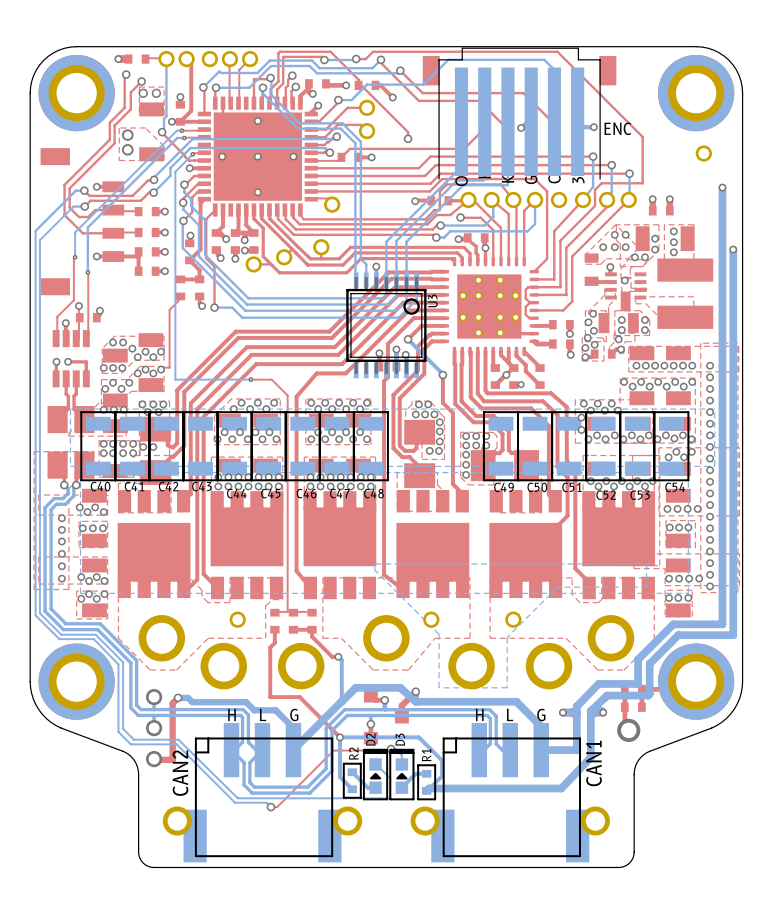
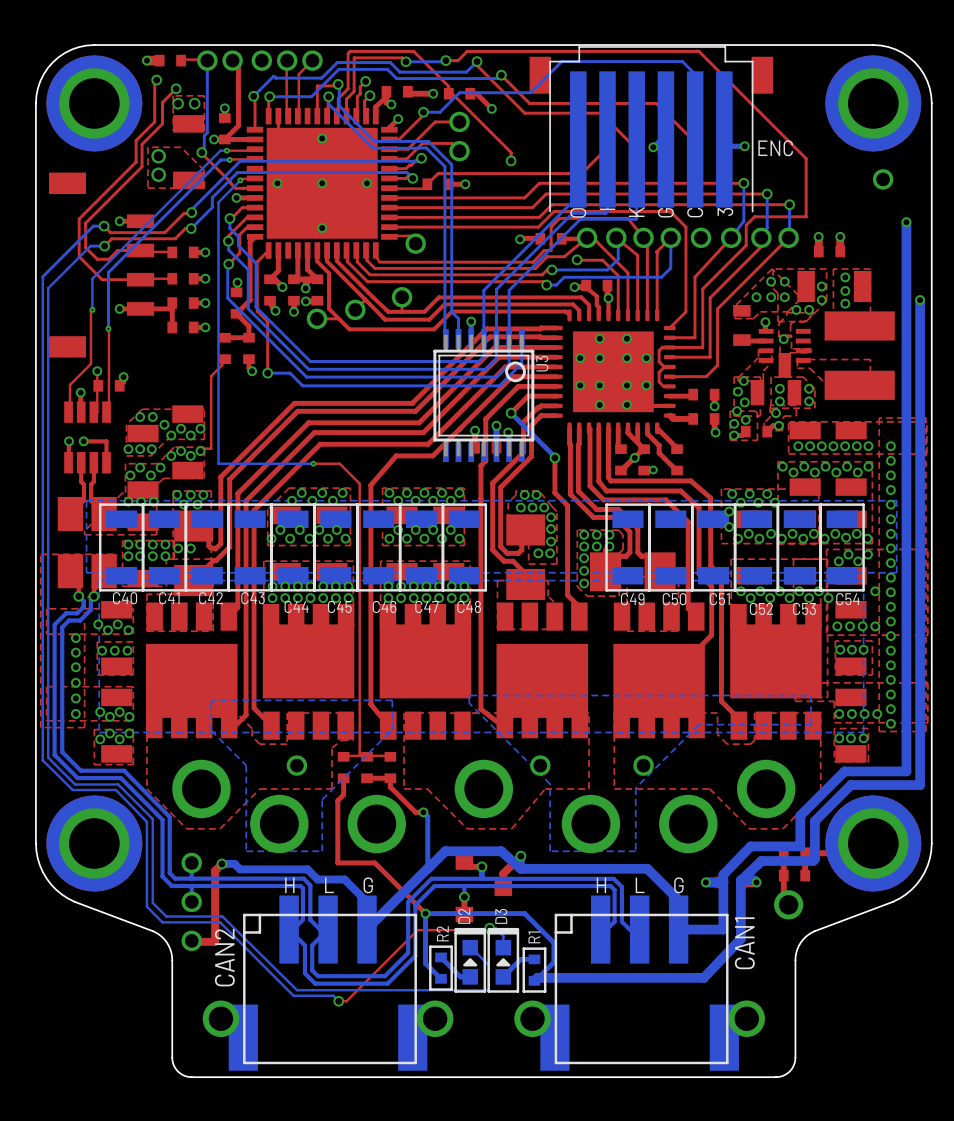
via: none -> (875, 591)
via: none -> (828, 598)
bottom zone outline: none -> (392, 700) (213, 700) (211, 702) (211, 730) (246, 765) (246, 851) (322, 851) (322, 799) (392, 729) (392, 700)

